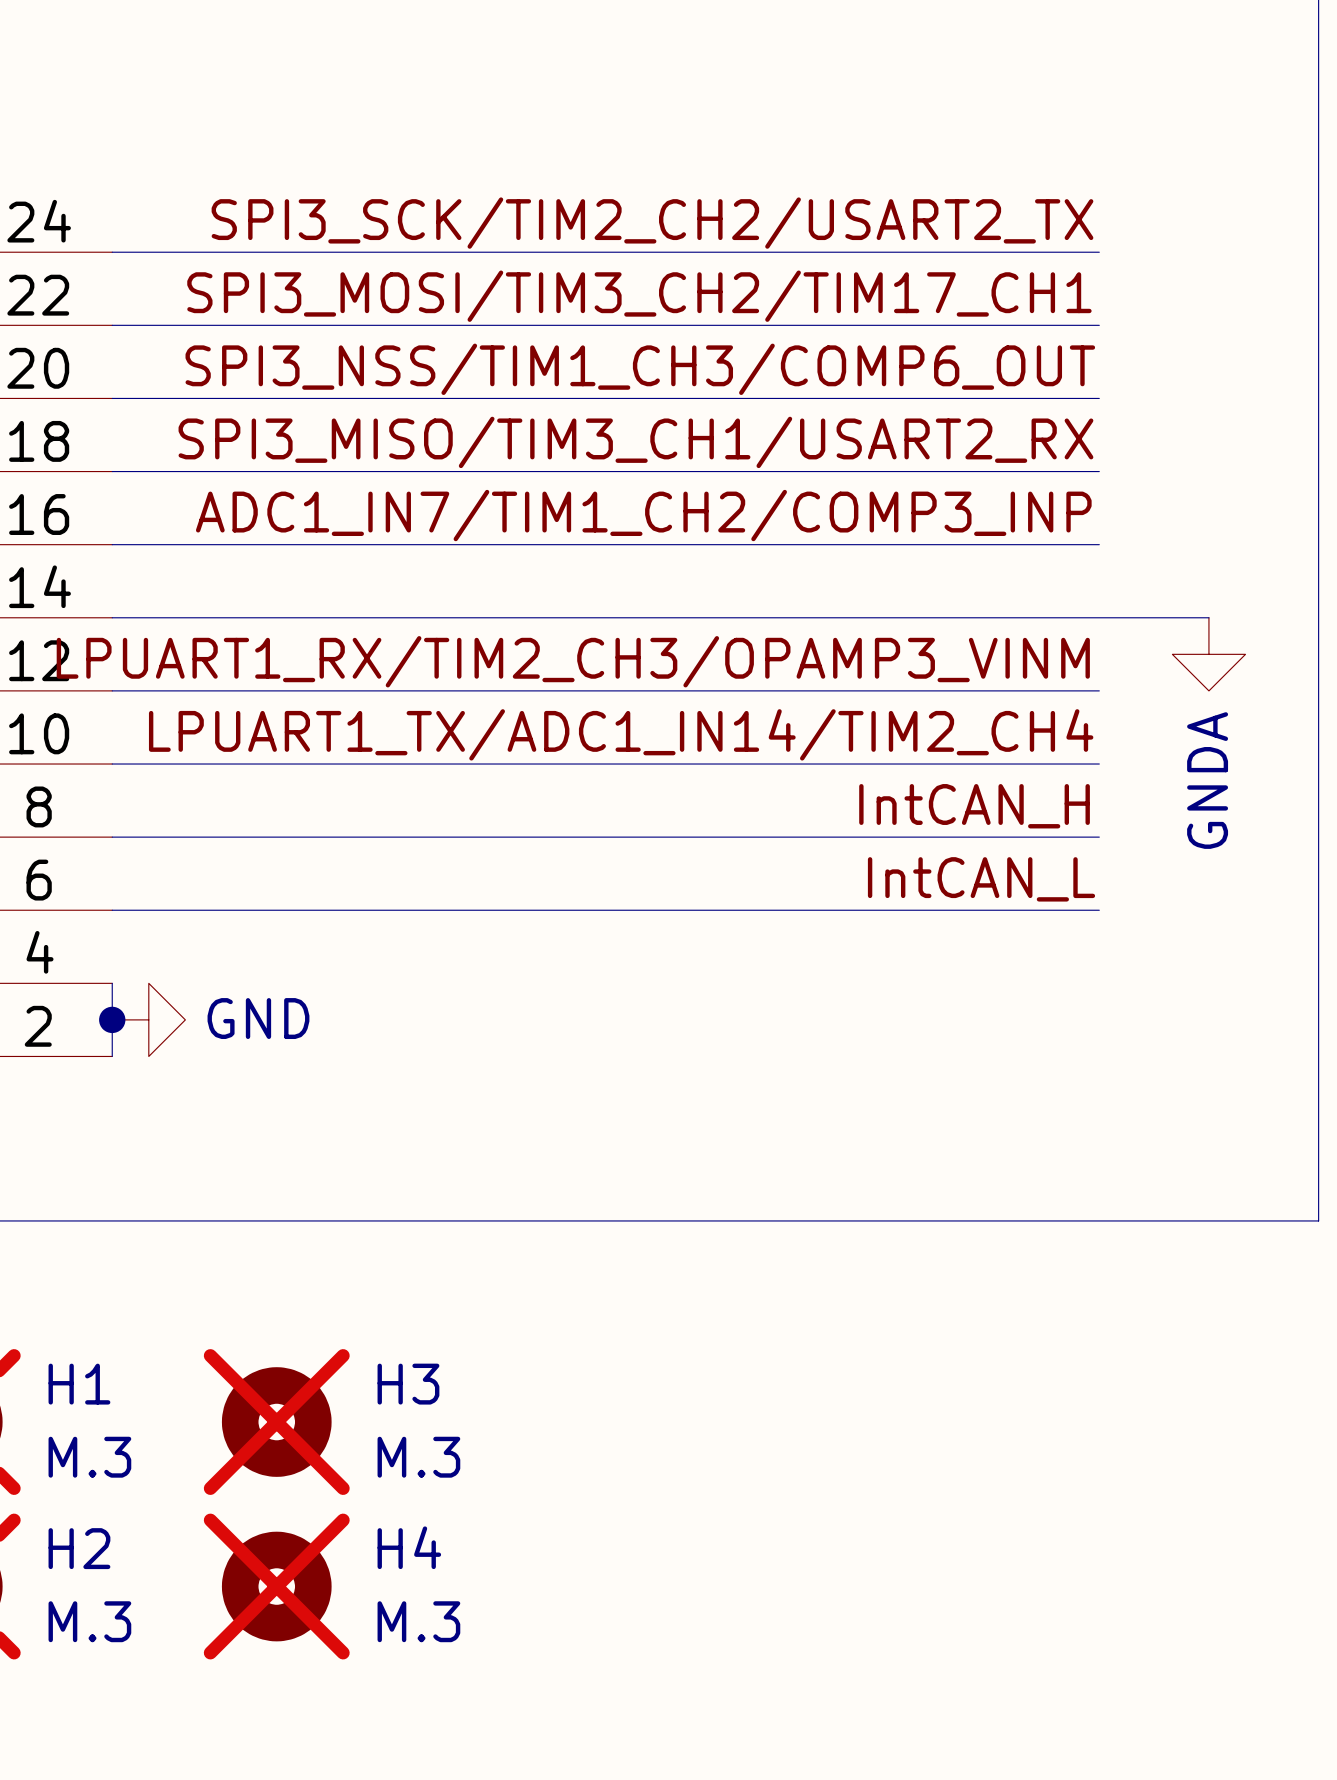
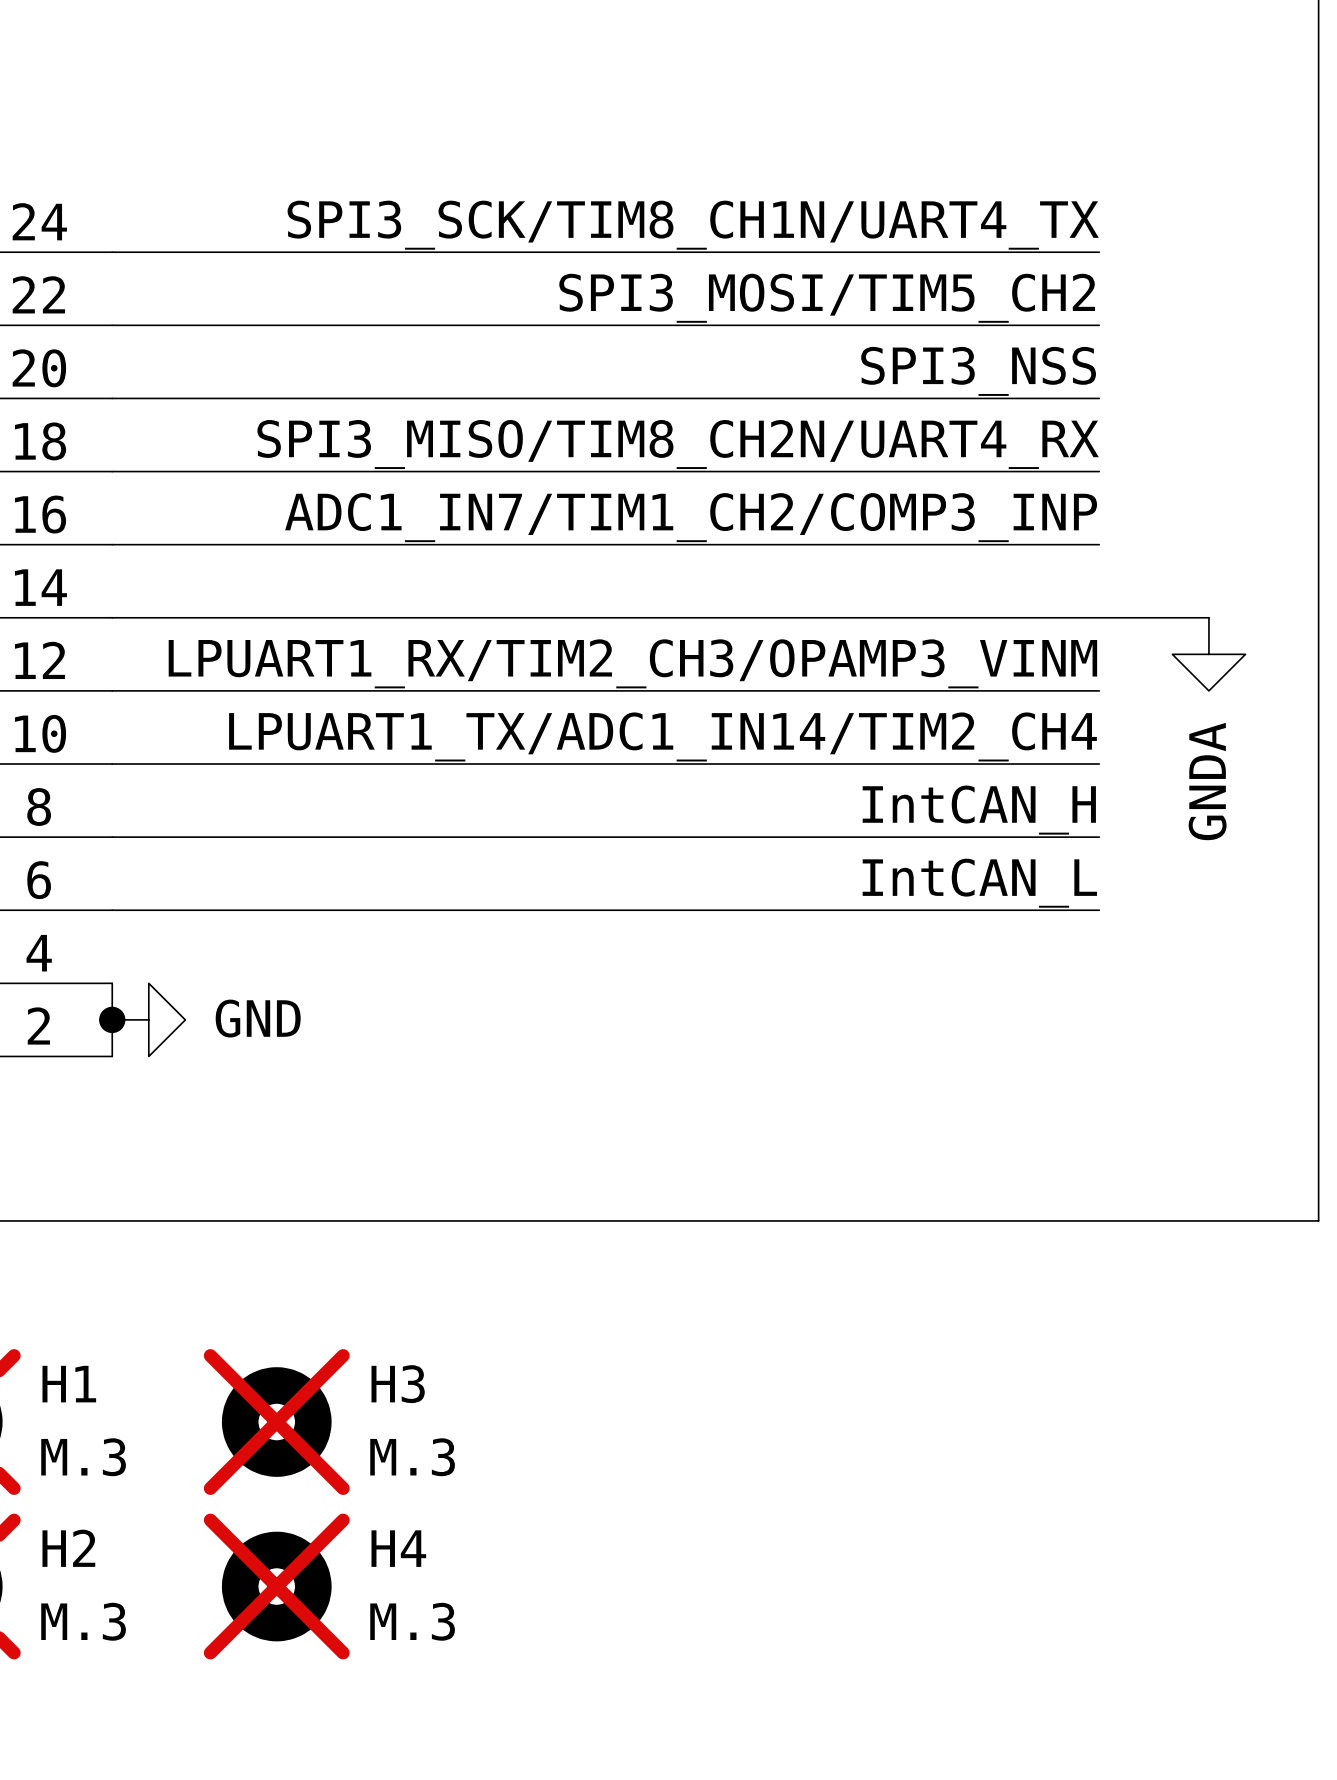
label: SPI3_SCK/TIM2_CH2/USART2_TX (652, 223) -> SPI3_SCK/TIM8_CH1N/UART4_TX (693, 225)
label: SPI3_MOSI/TIM3_CH2/TIM17_CH1 (639, 296) -> SPI3_MOSI/TIM5_CH2 (827, 298)
label: SPI3_NSS/TIM1_CH3/COMP6_OUT (640, 369) -> SPI3_NSS (978, 371)
label: SPI3_MISO/TIM3_CH1/USART2_RX (635, 442) -> SPI3_MISO/TIM8_CH2N/UART4_RX (678, 444)

